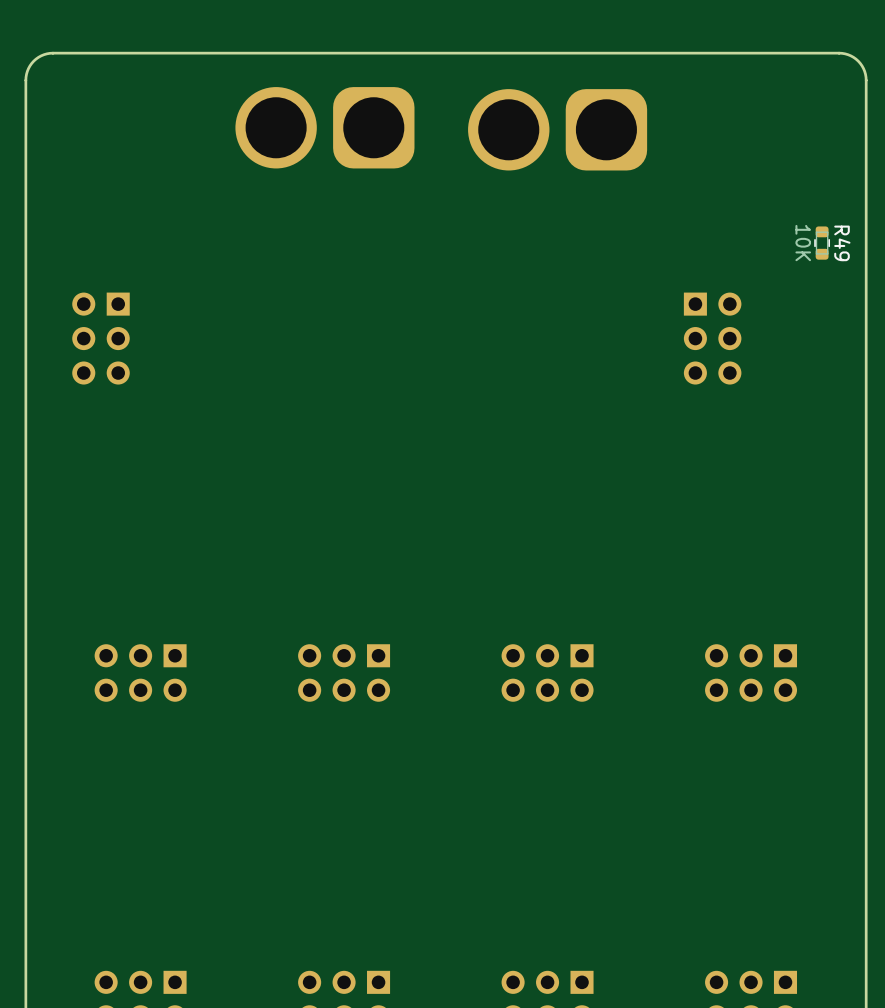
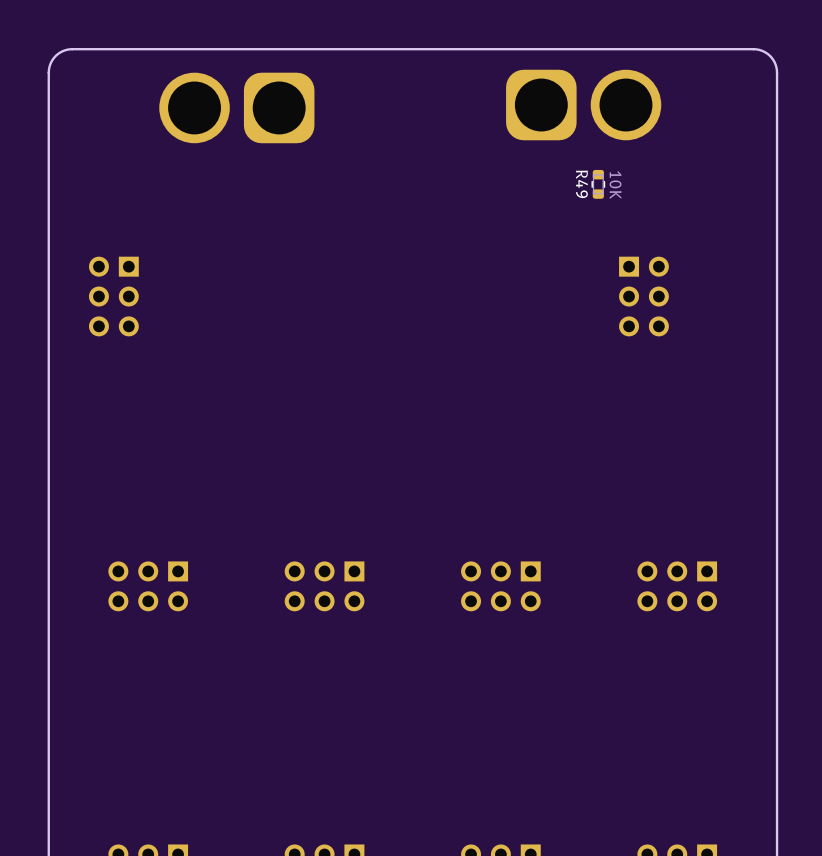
part position: (324, 127) -> (236, 107)
part rotation: 0° (557, 129) -> 180° (583, 105)
R49 value position: 10K (803, 243) -> 10K (615, 185)
R49 position: (822, 243) -> (598, 184)
R49 name position: R49 (842, 243) -> R49 (581, 184)

